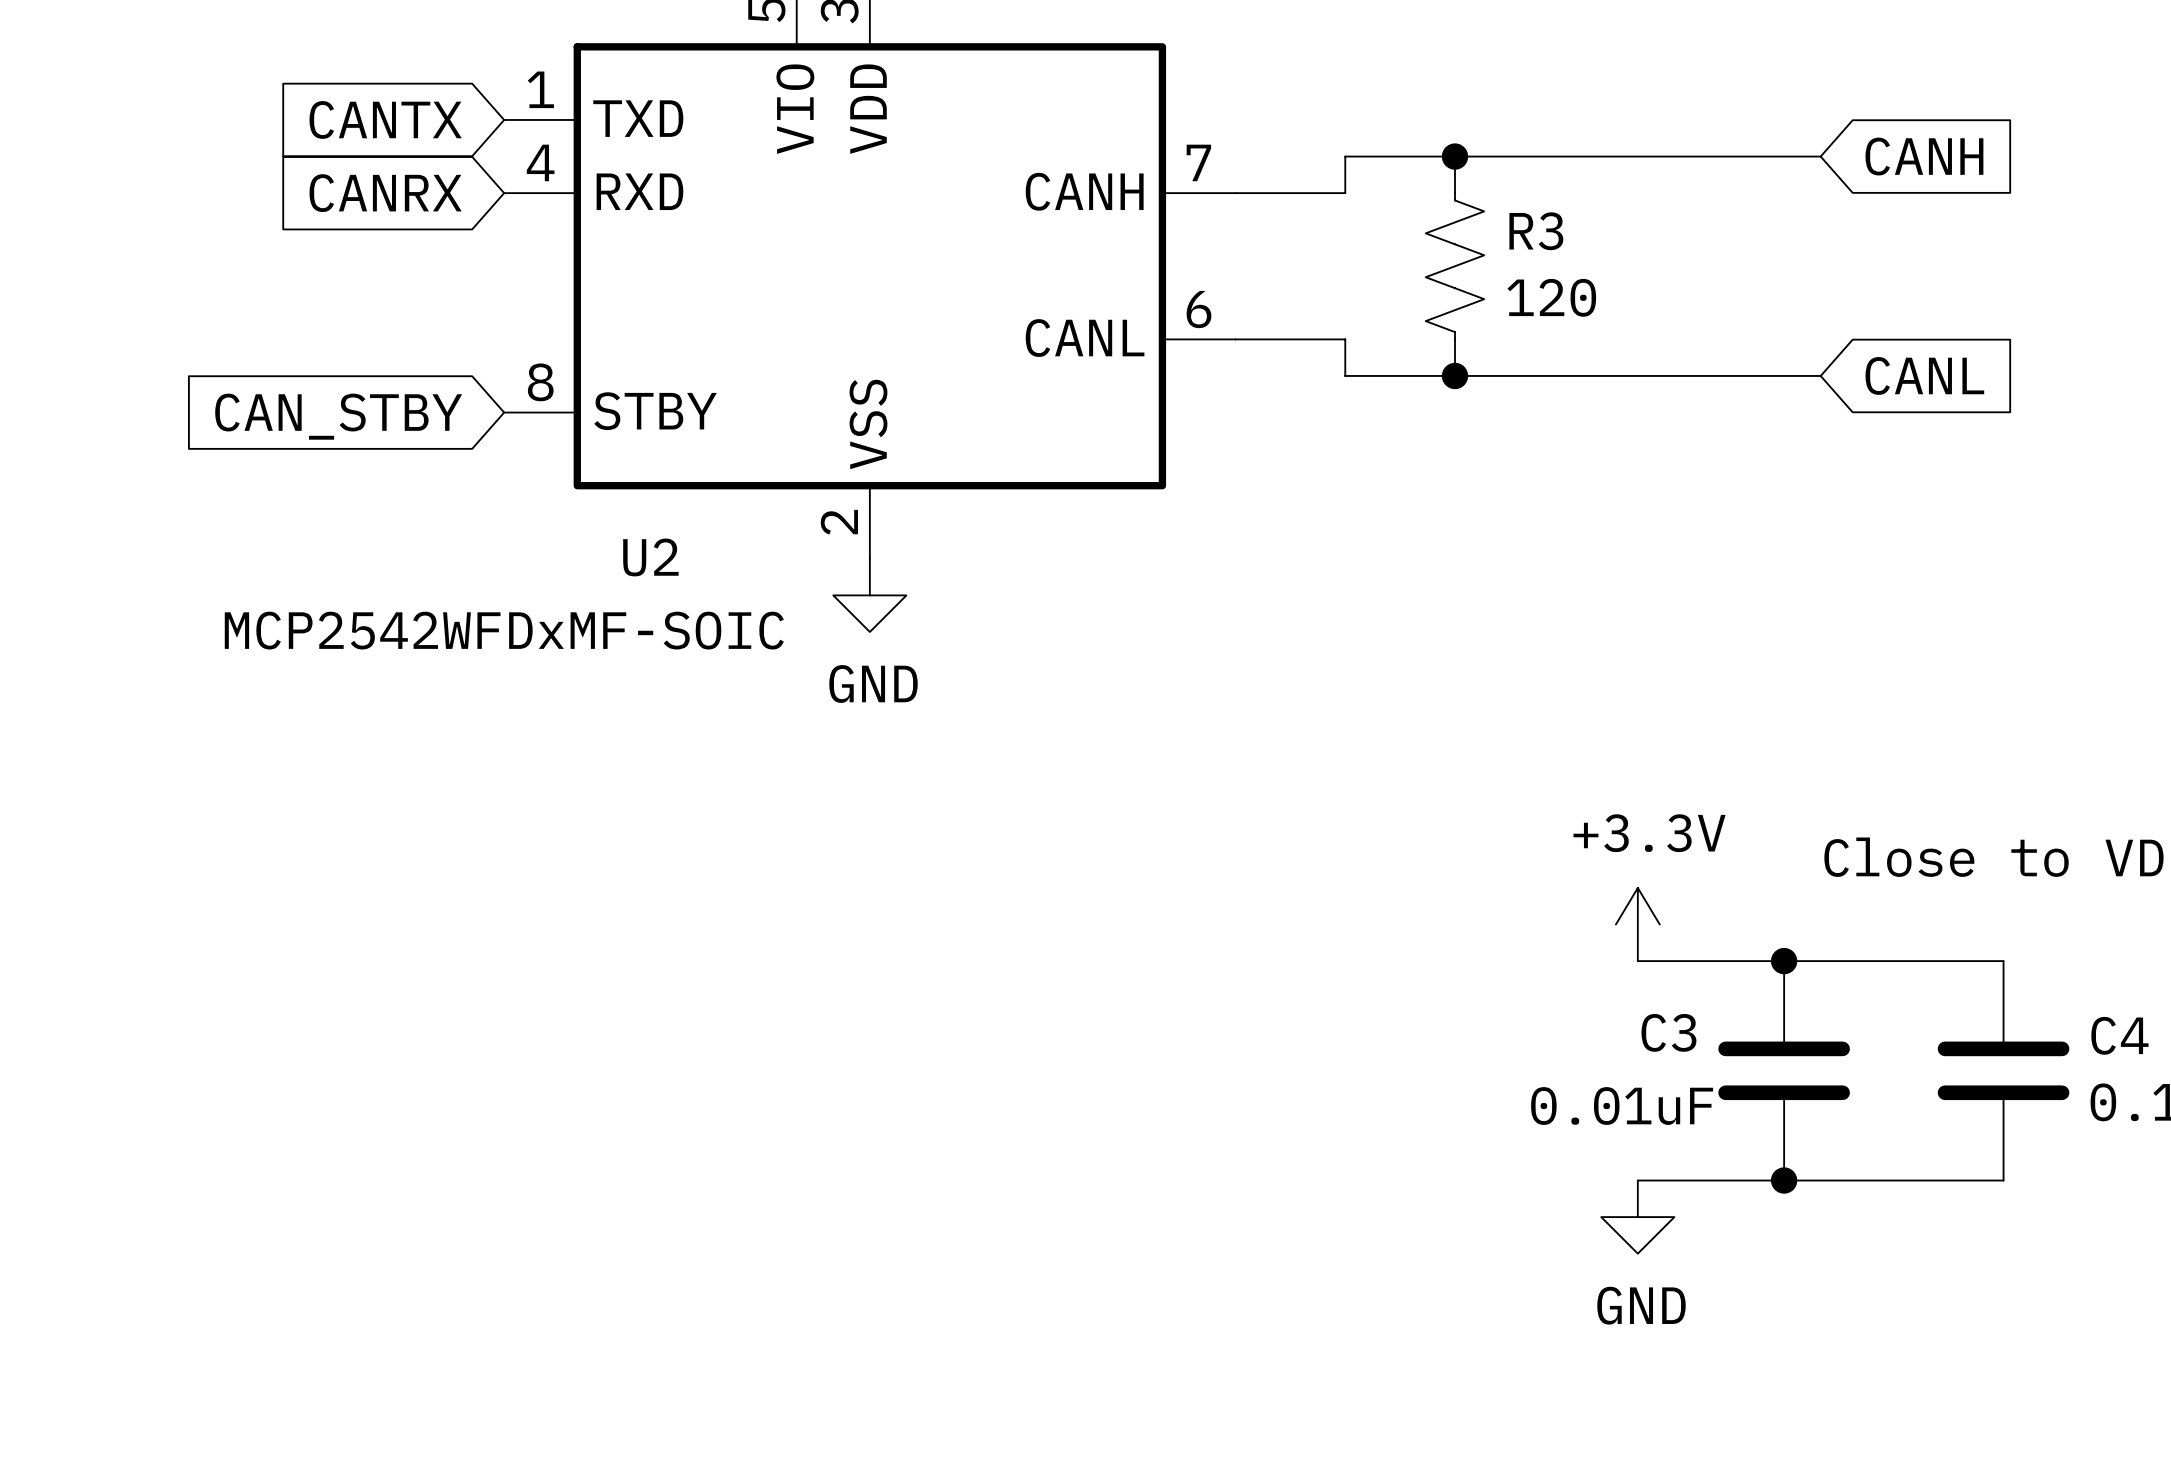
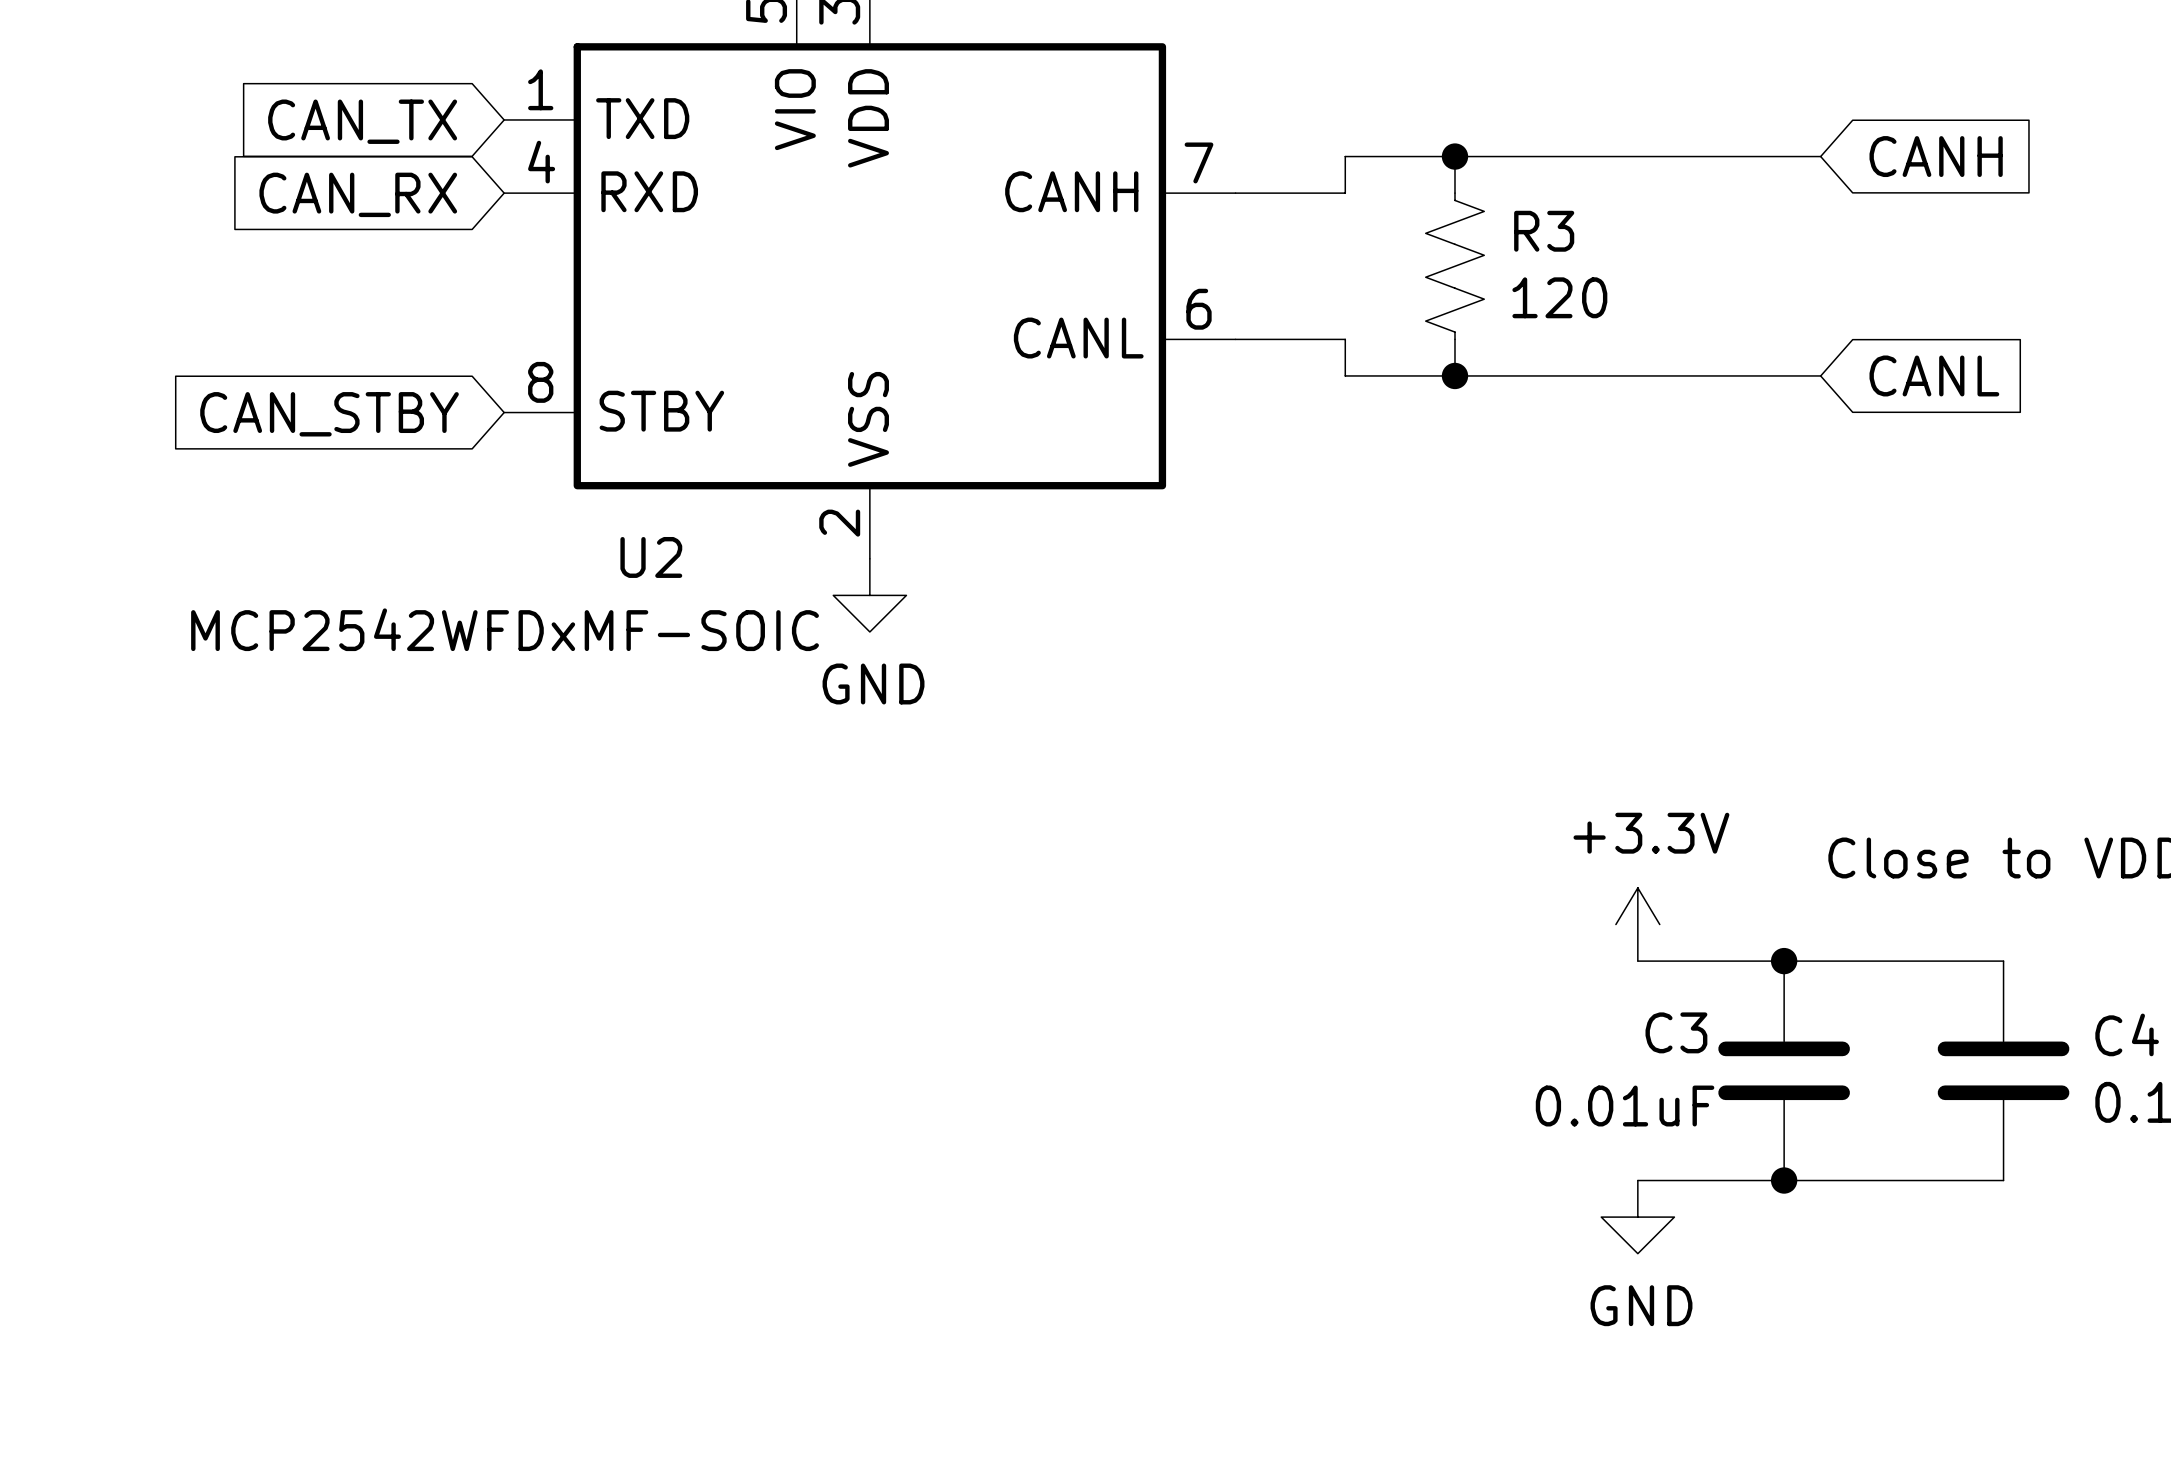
global label: CANTX (385, 119) -> CAN_TX (362, 121)
global label: CANRX (385, 193) -> CAN_RX (358, 194)

